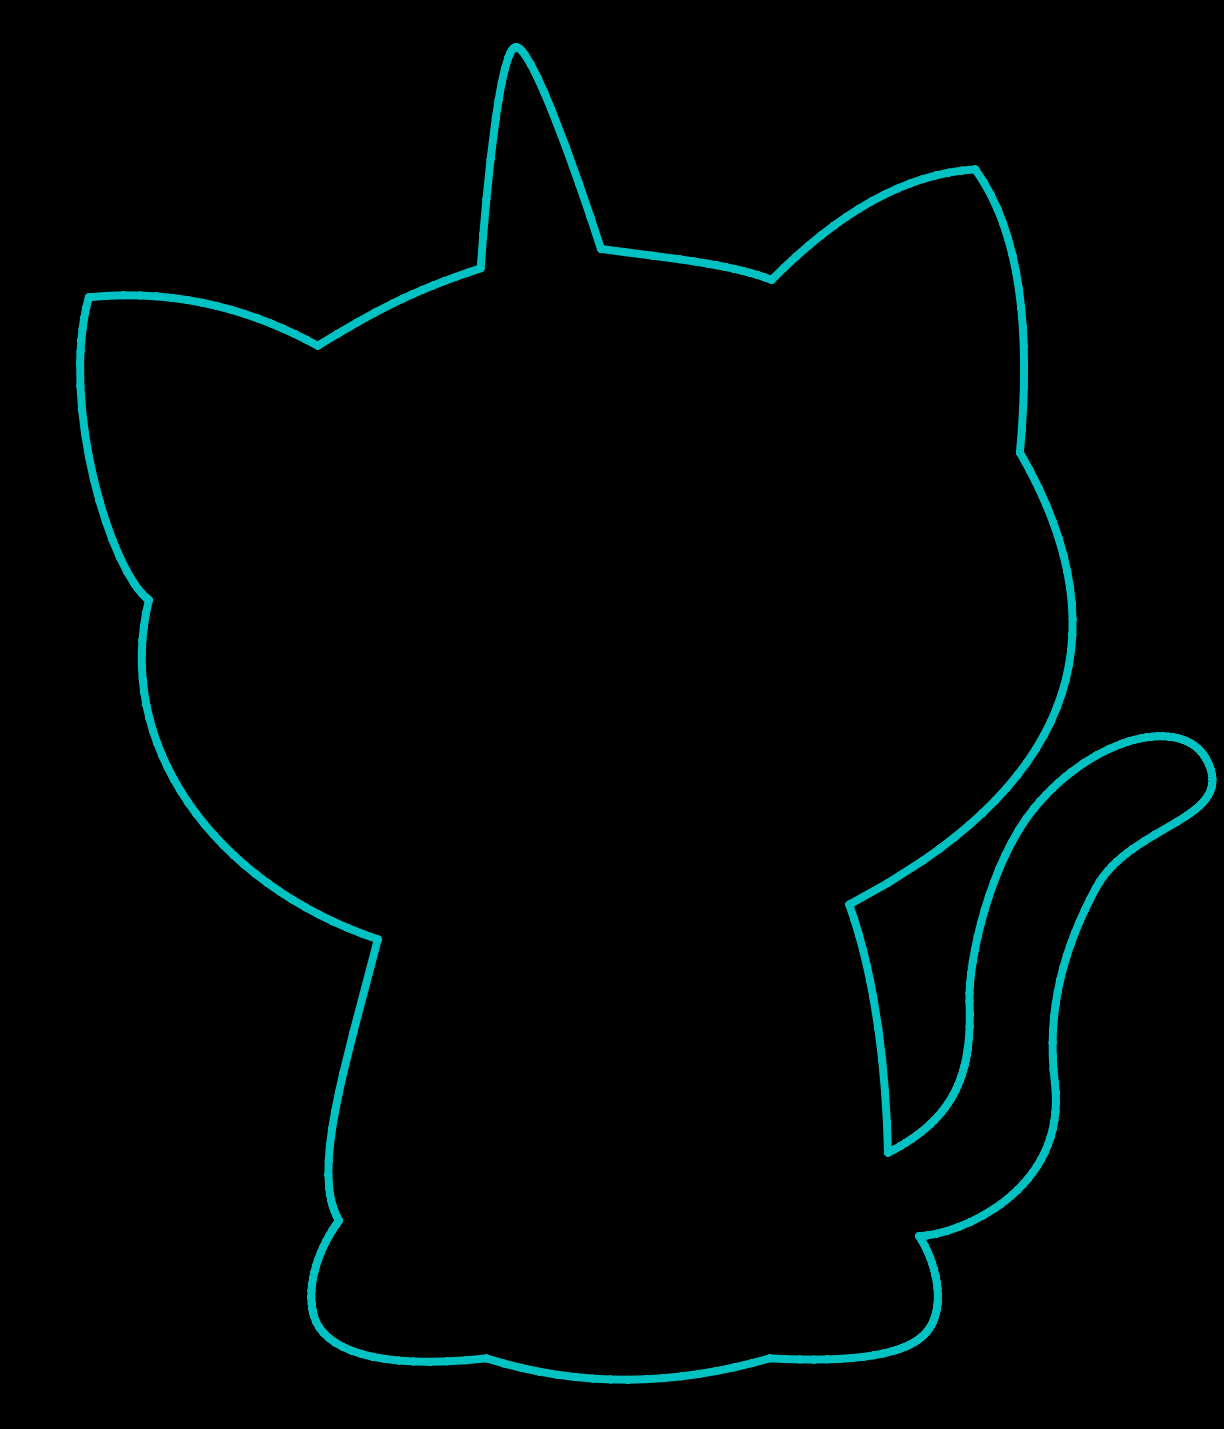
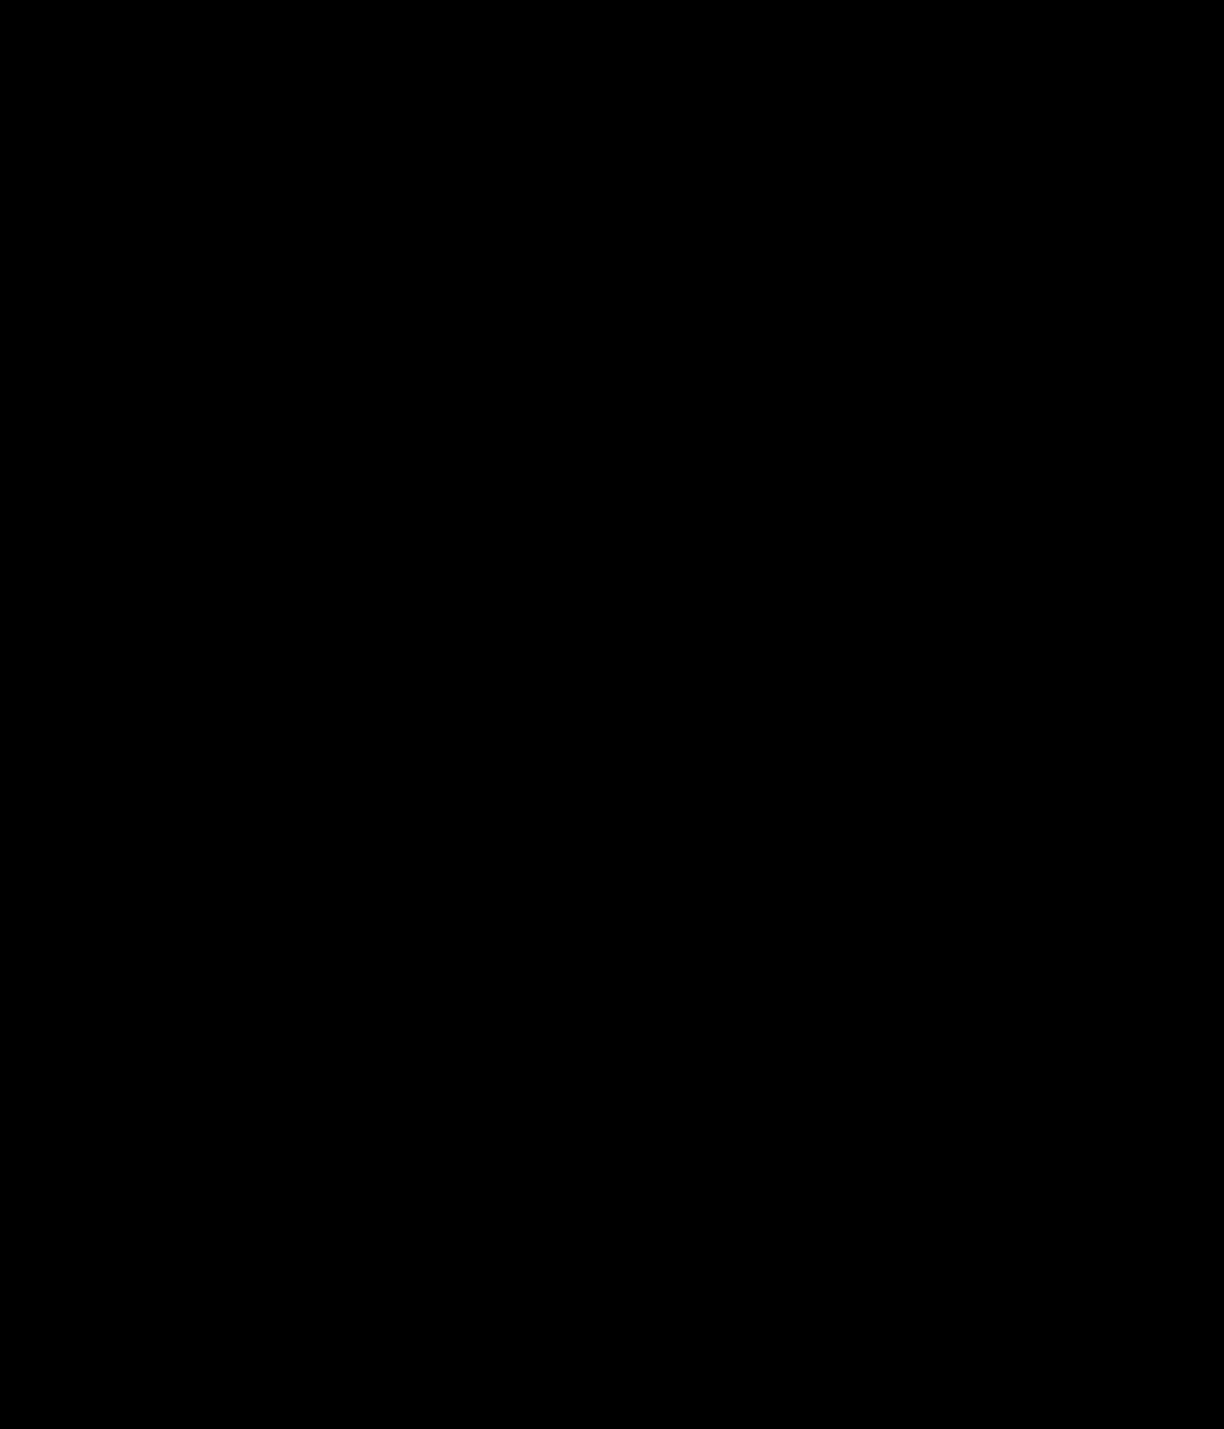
line: (515, 47) (524, 54) (544, 92) (565, 146) (600, 248) (716, 265) (771, 279) (821, 235) (871, 201) (922, 179) (948, 172) (975, 169) (990, 194) (1003, 223) (1016, 272) (1022, 326) (1023, 387) (1019, 452) (1046, 505) (1063, 555) (1071, 603) (1071, 649) (1065, 679) (1050, 721) (1035, 748) (1006, 788) (982, 813) (939, 849) (887, 882) (849, 904) (866, 965) (878, 1028) (885, 1091) (888, 1152) (911, 1139) (930, 1124) (944, 1107) (957, 1085) (967, 1049) (971, 973) (980, 923) (993, 882) (1005, 855) (1018, 830) (1034, 808) (1058, 782) (1083, 763) (1109, 748) (1140, 738) (1168, 736) (1186, 741) (1201, 751) (1210, 769) (1211, 787) (1202, 802) (1186, 815) (1127, 852) (1107, 871) (1095, 888) (1070, 944) (1057, 991) (1052, 1042) (1055, 1111) (1052, 1128) (1044, 1152) (1022, 1184) (994, 1208) (958, 1226) (936, 1233) (919, 1236) (929, 1257) (935, 1275) (937, 1294) (935, 1313) (930, 1326) (922, 1336) (911, 1343) (892, 1351) (839, 1358) (769, 1358) (716, 1370) (663, 1378) (592, 1378) (539, 1371) (486, 1358) (429, 1361) (372, 1356) (351, 1350) (335, 1342) (323, 1332) (313, 1315) (311, 1297) (314, 1271) (323, 1247) (339, 1220) (332, 1205) (329, 1188) (328, 1160) (332, 1128) (343, 1073) (377, 939) (319, 914) (292, 899) (255, 873) (233, 855) (204, 824) (180, 790) (167, 767) (149, 718) (142, 679) (142, 639) (148, 599) (134, 583) (112, 540) (99, 500) (88, 456) (80, 386) (80, 351) (84, 318) (88, 297) (123, 295) (172, 297) (202, 302) (244, 313) (282, 328) (317, 345) (402, 298) (480, 268) (490, 158) (498, 99) (508, 57) (515, 47) -> none

